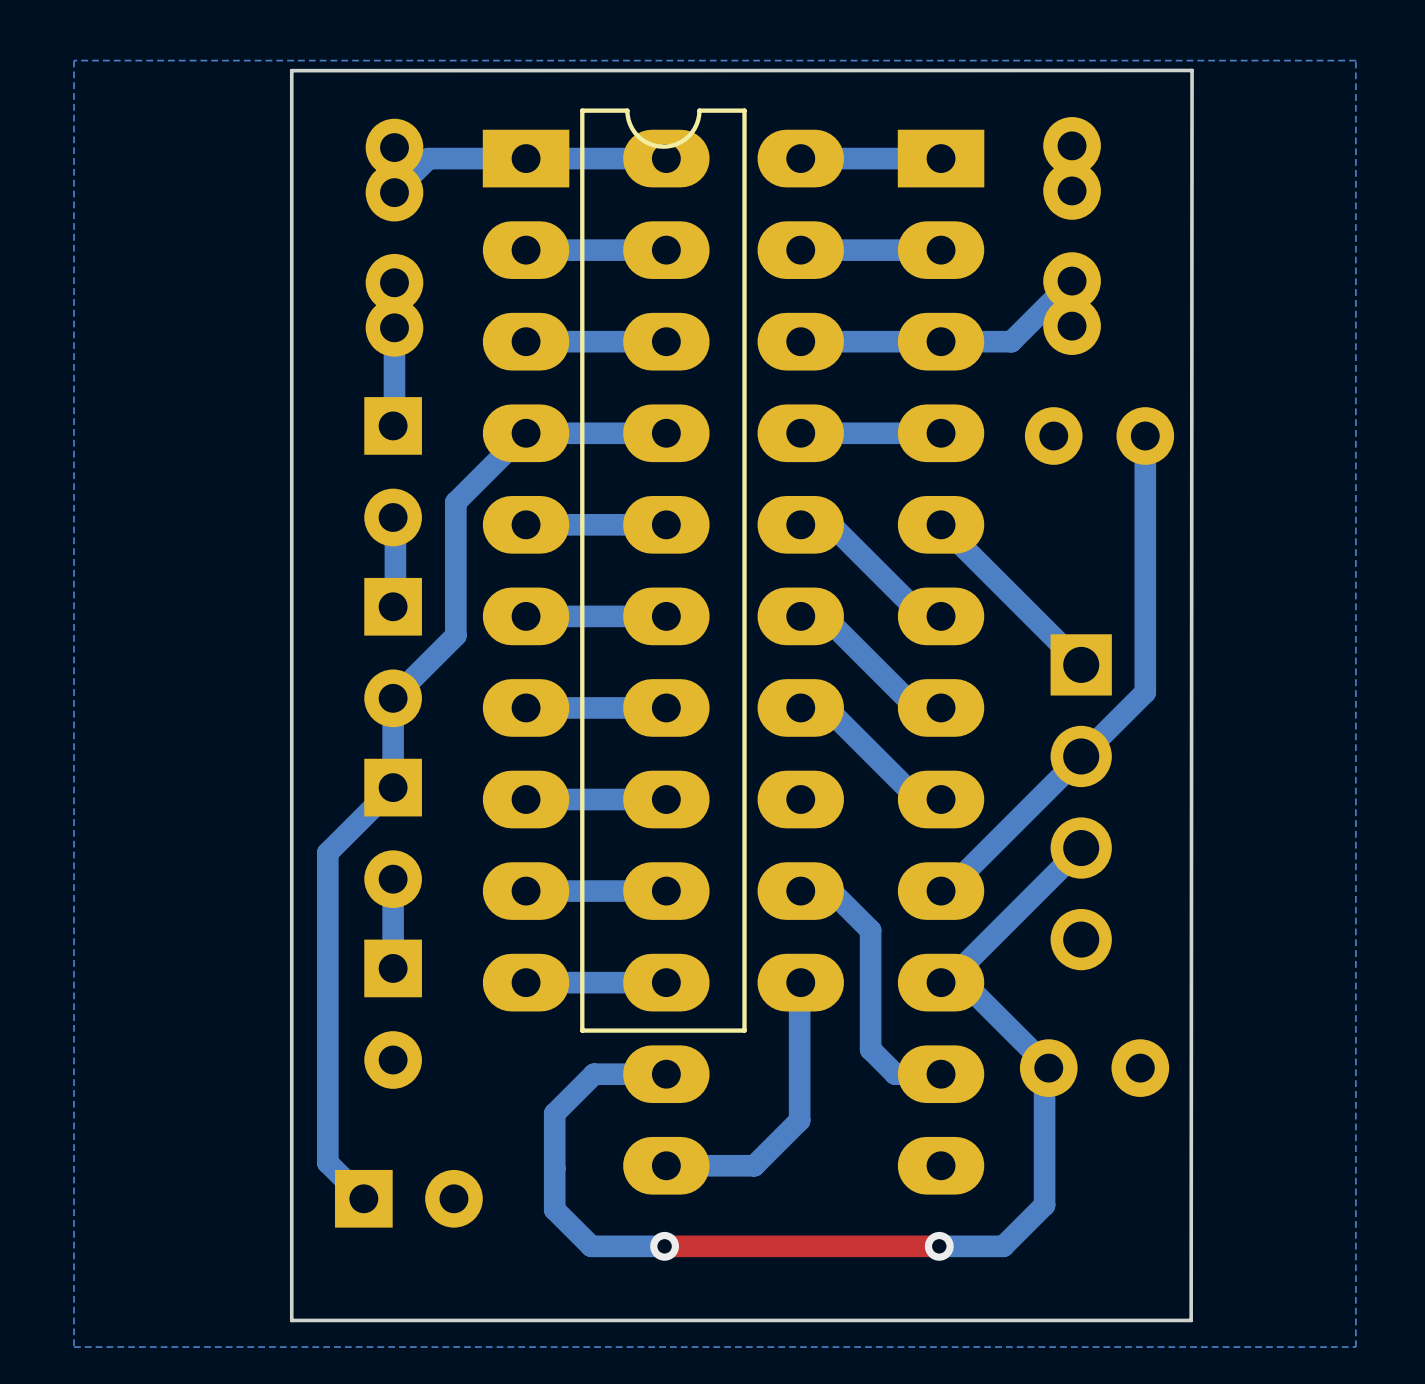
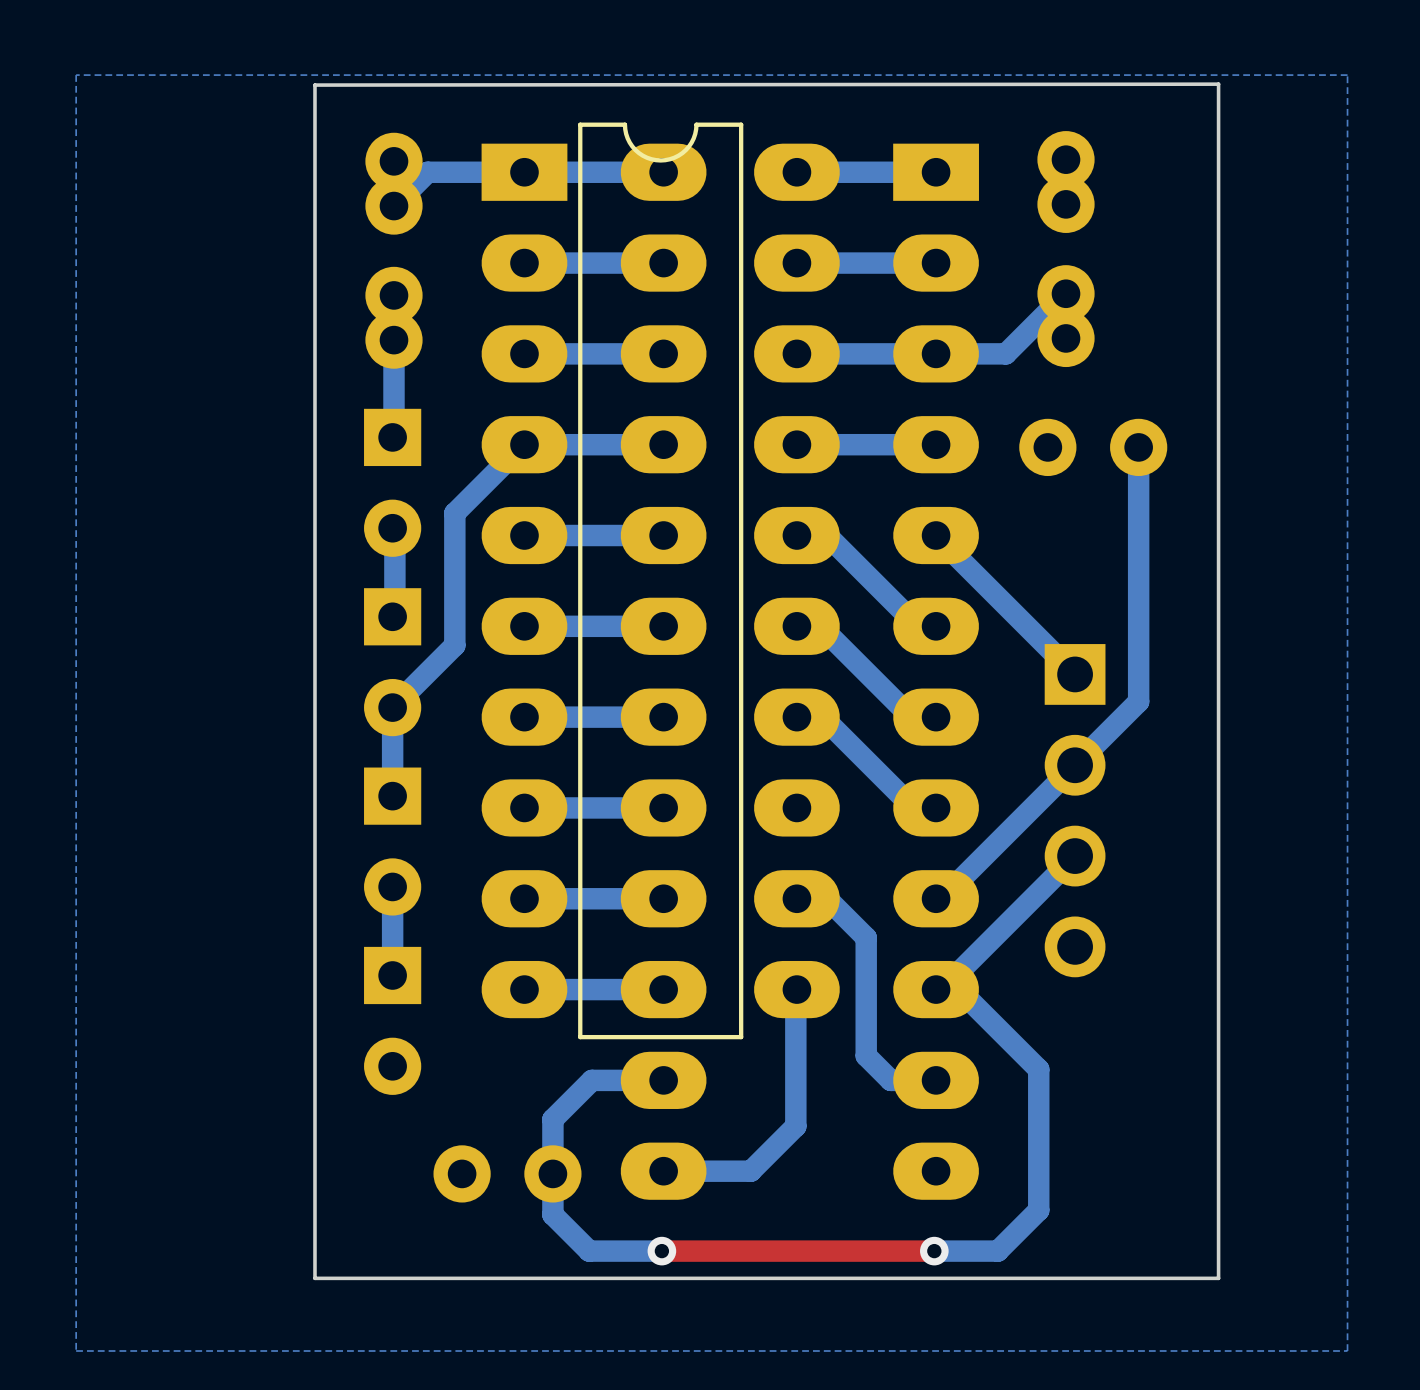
board edge: (1192, 70) (291, 70) (291, 1320) (1191, 1320) (1192, 70) -> (1218, 84) (1218, 1278) (314, 1278) (314, 85) (1218, 84)
bottom track: (393, 787) (327, 852) (327, 1162) (363, 1198) -> none
part position: (1094, 1068) -> (507, 1173)
part: (408, 1198) -> none

